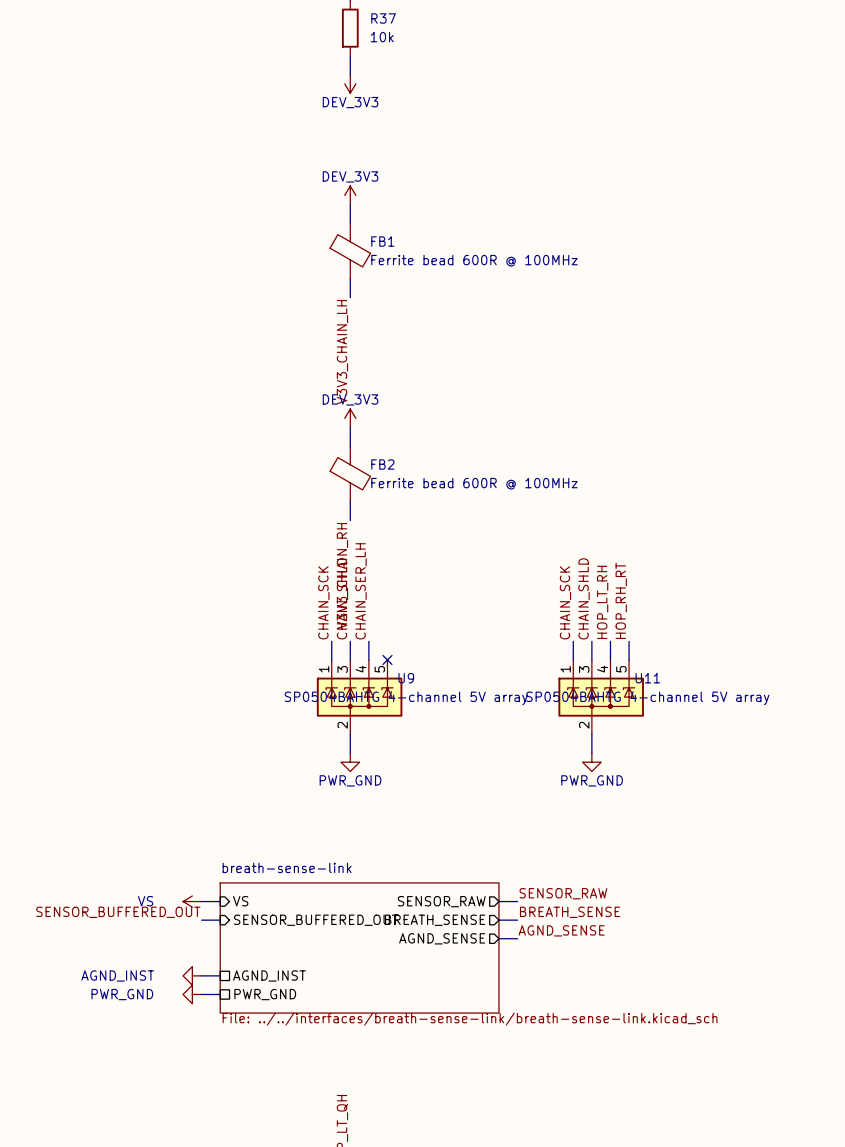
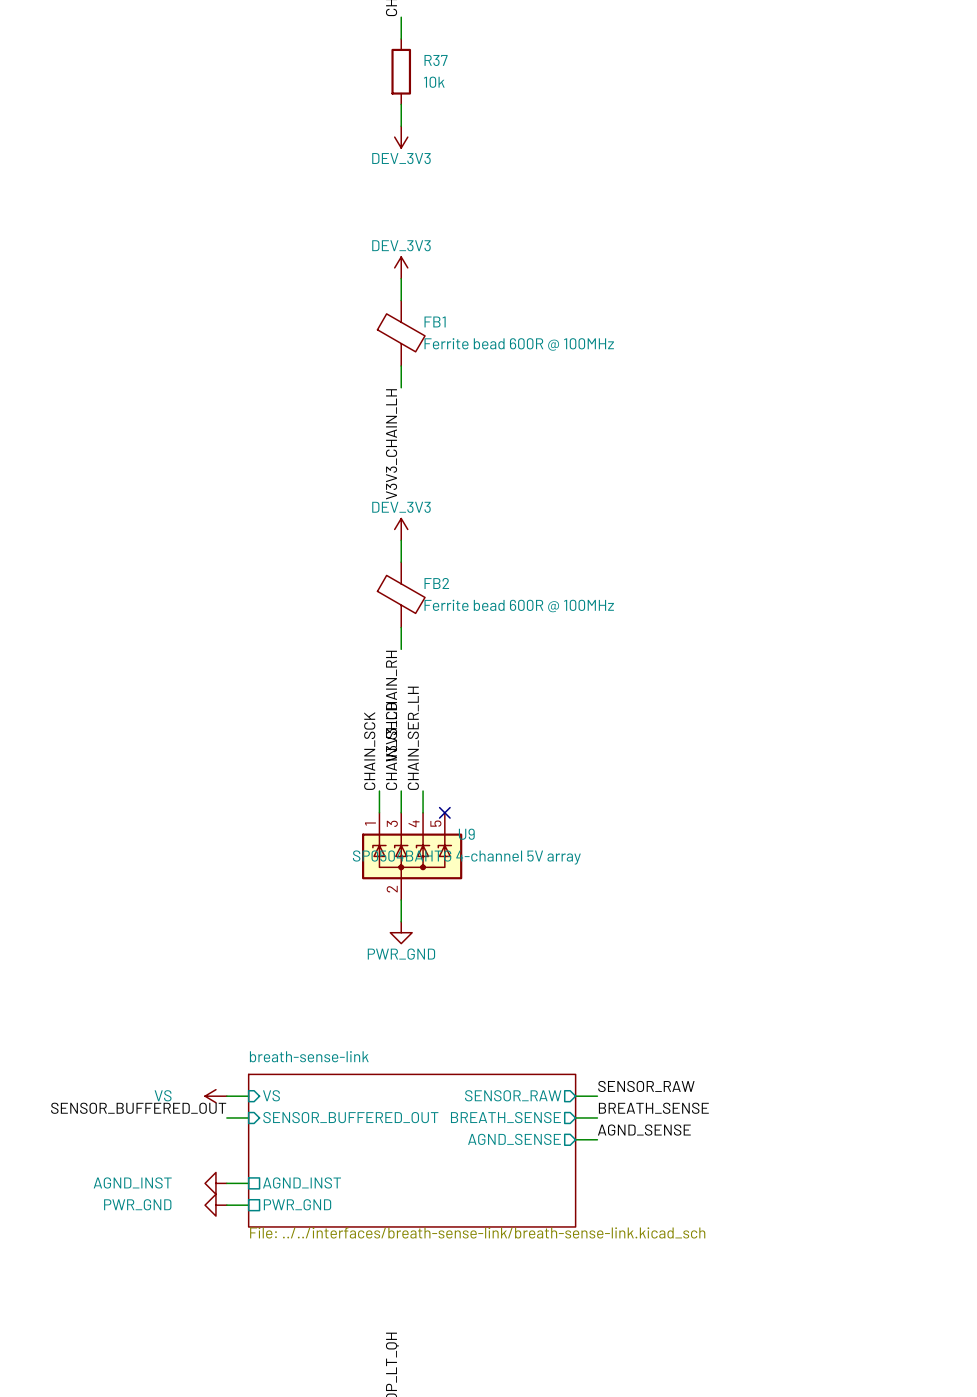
label: CHAIN_SHLD (584, 598) -> none
label: HOP_RH_RT (621, 600) -> none
label: CHAIN_SCK (565, 602) -> none
label: HOP_LT_RH (602, 602) -> none
wire: (573, 641) (573, 659) -> none
wire: (591, 641) (591, 659) -> none
wire: (610, 641) (610, 659) -> none
wire: (629, 641) (629, 659) -> none
U11: SP0504BAHTG 4-channel 5V array (601, 697) -> none
wire: (591, 734) (591, 752) -> none
power symbol: PWR_GND (591, 762) -> none

